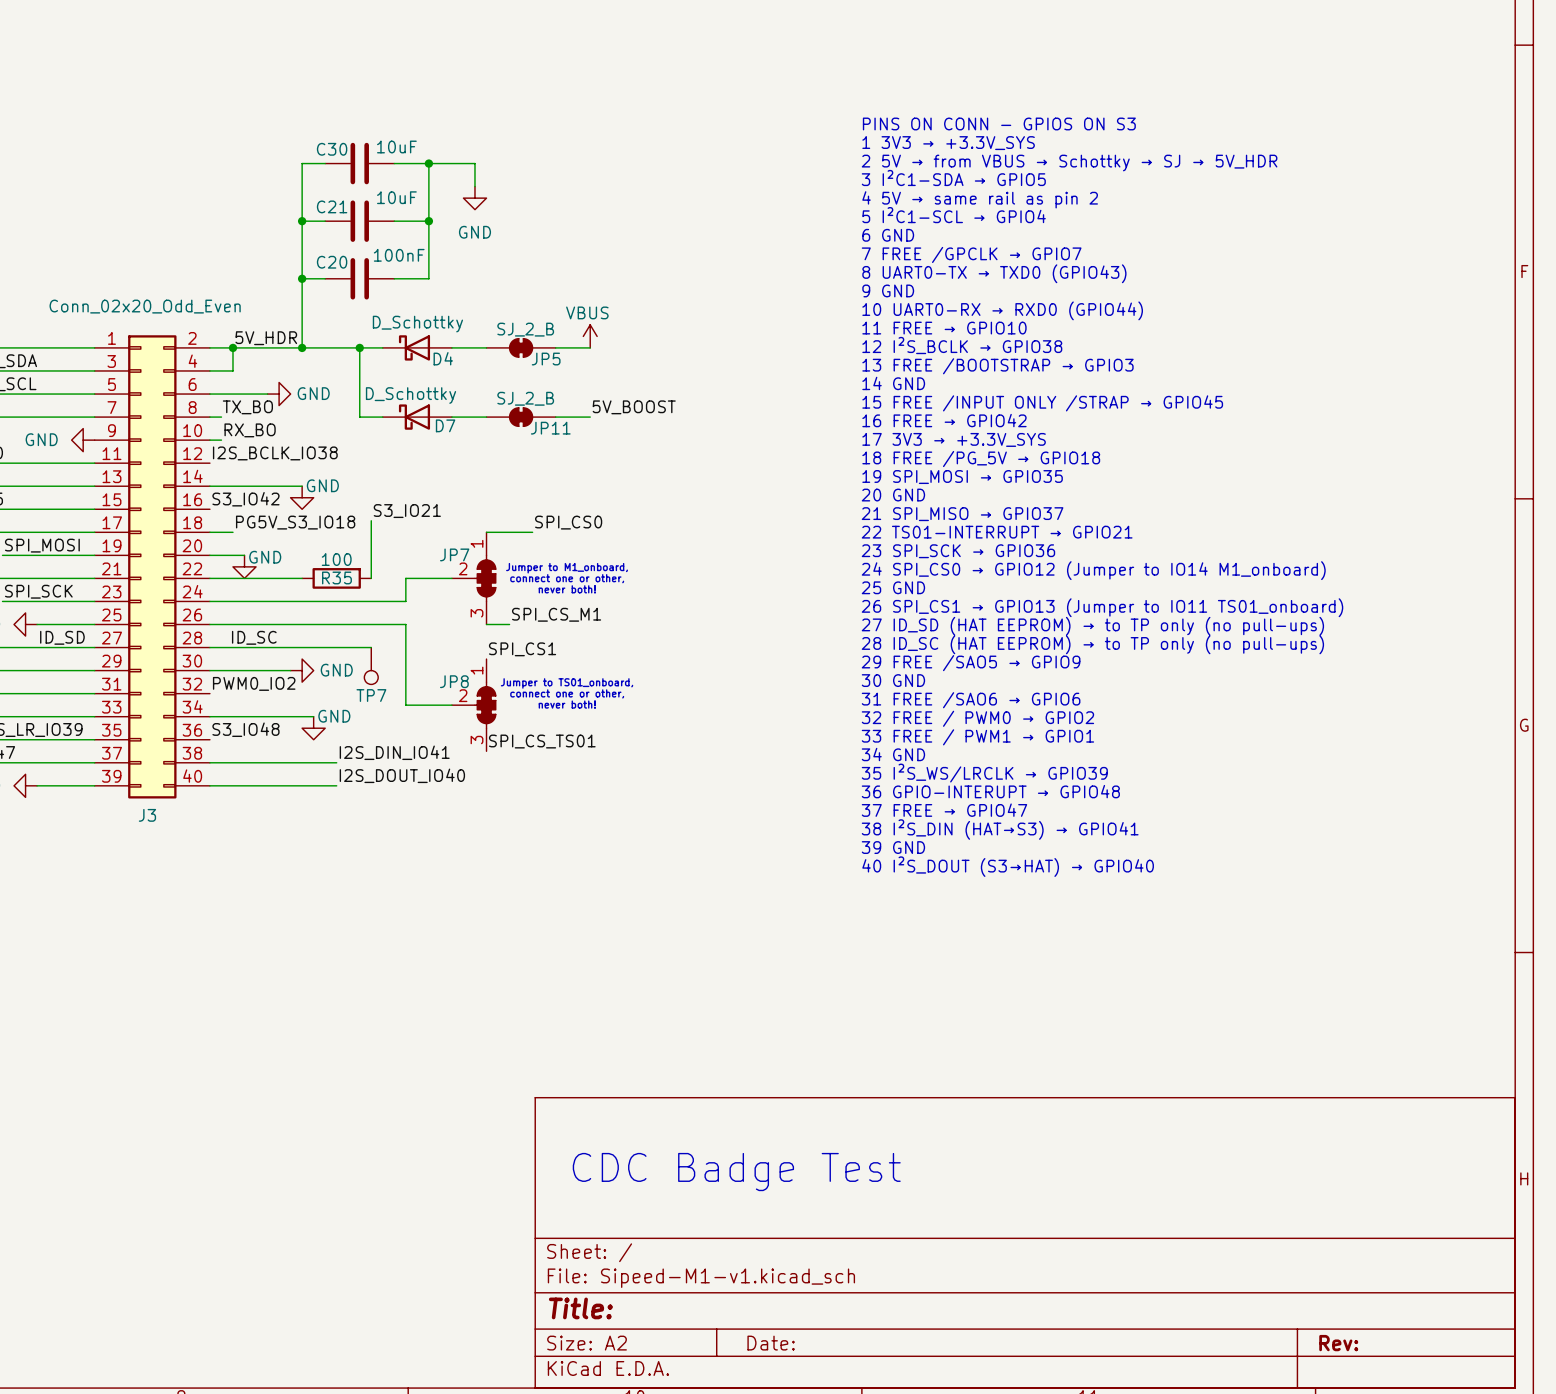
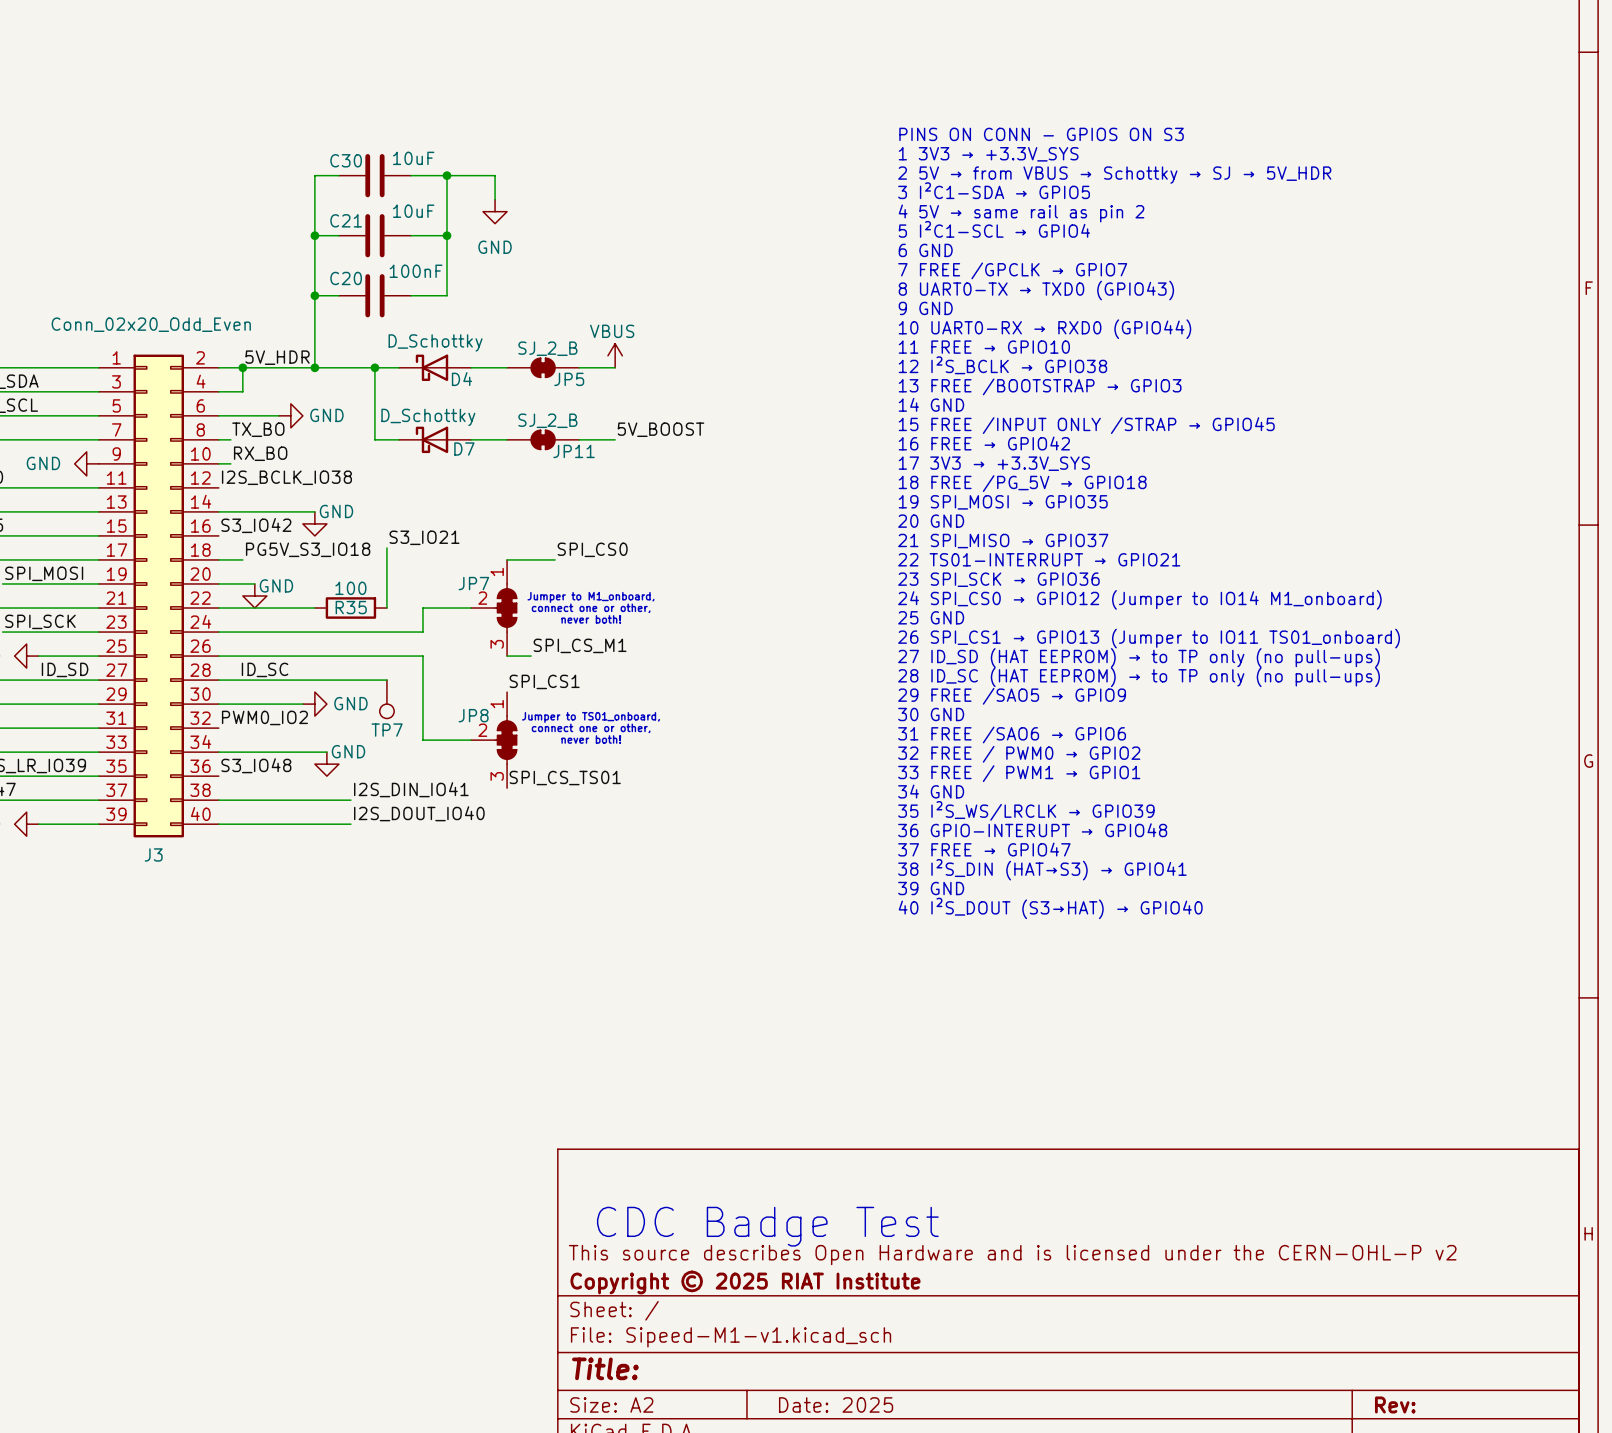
title block: none -> This source describes Open Hardware and is licensed under the CERN-OHL-P v2 (1012, 1255)
title block: none -> Copyright © 2025 RIAT Institute (745, 1282)
title block: Date: (771, 1343) -> Date: 2025 (836, 1404)

